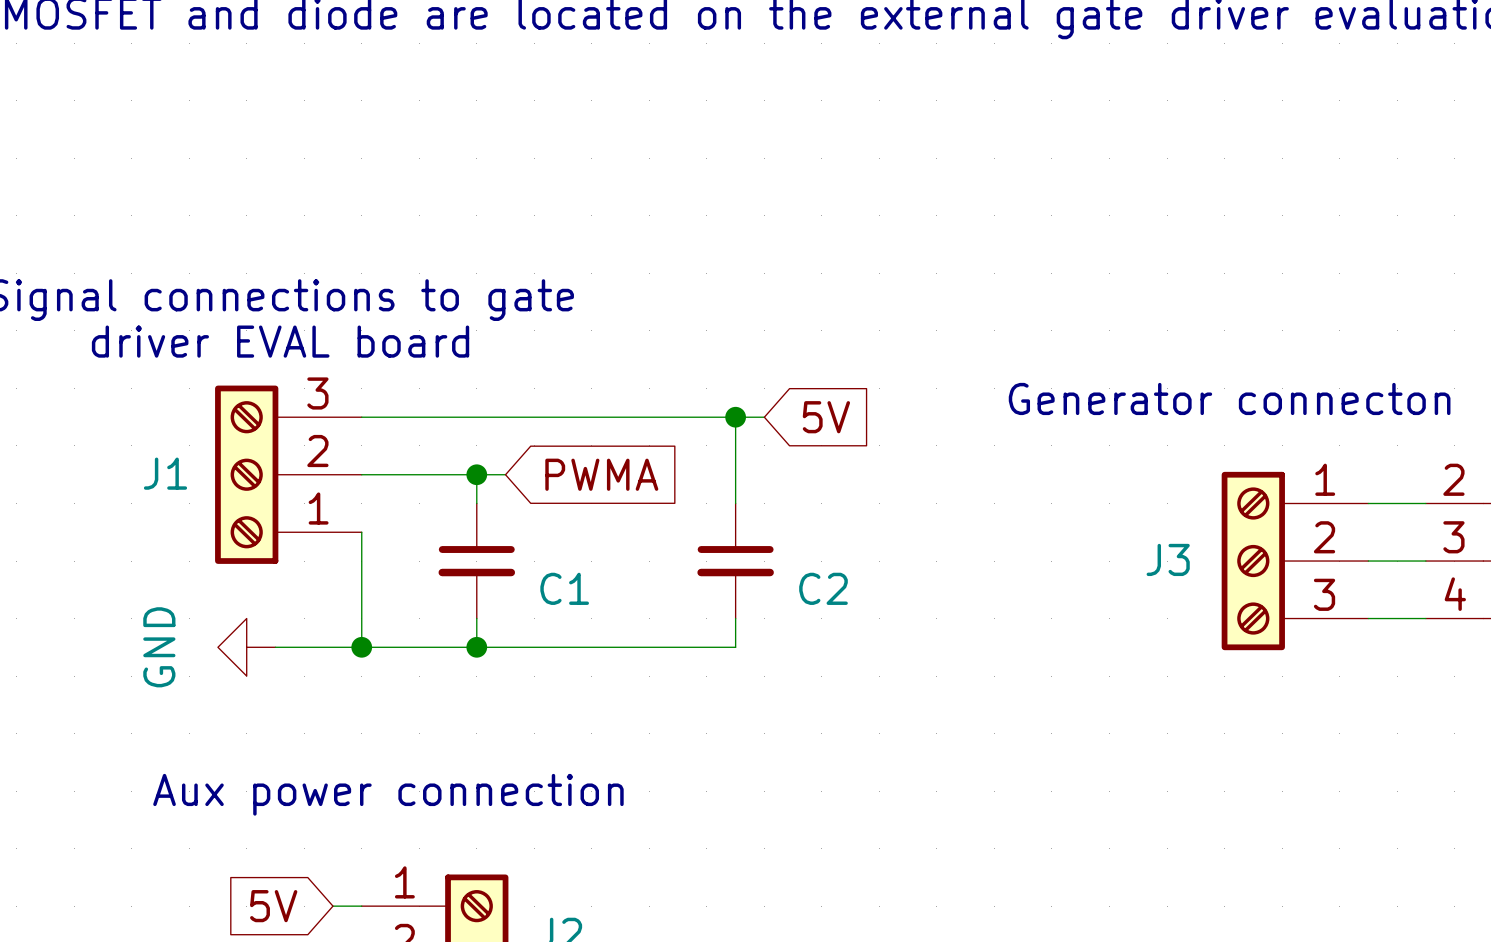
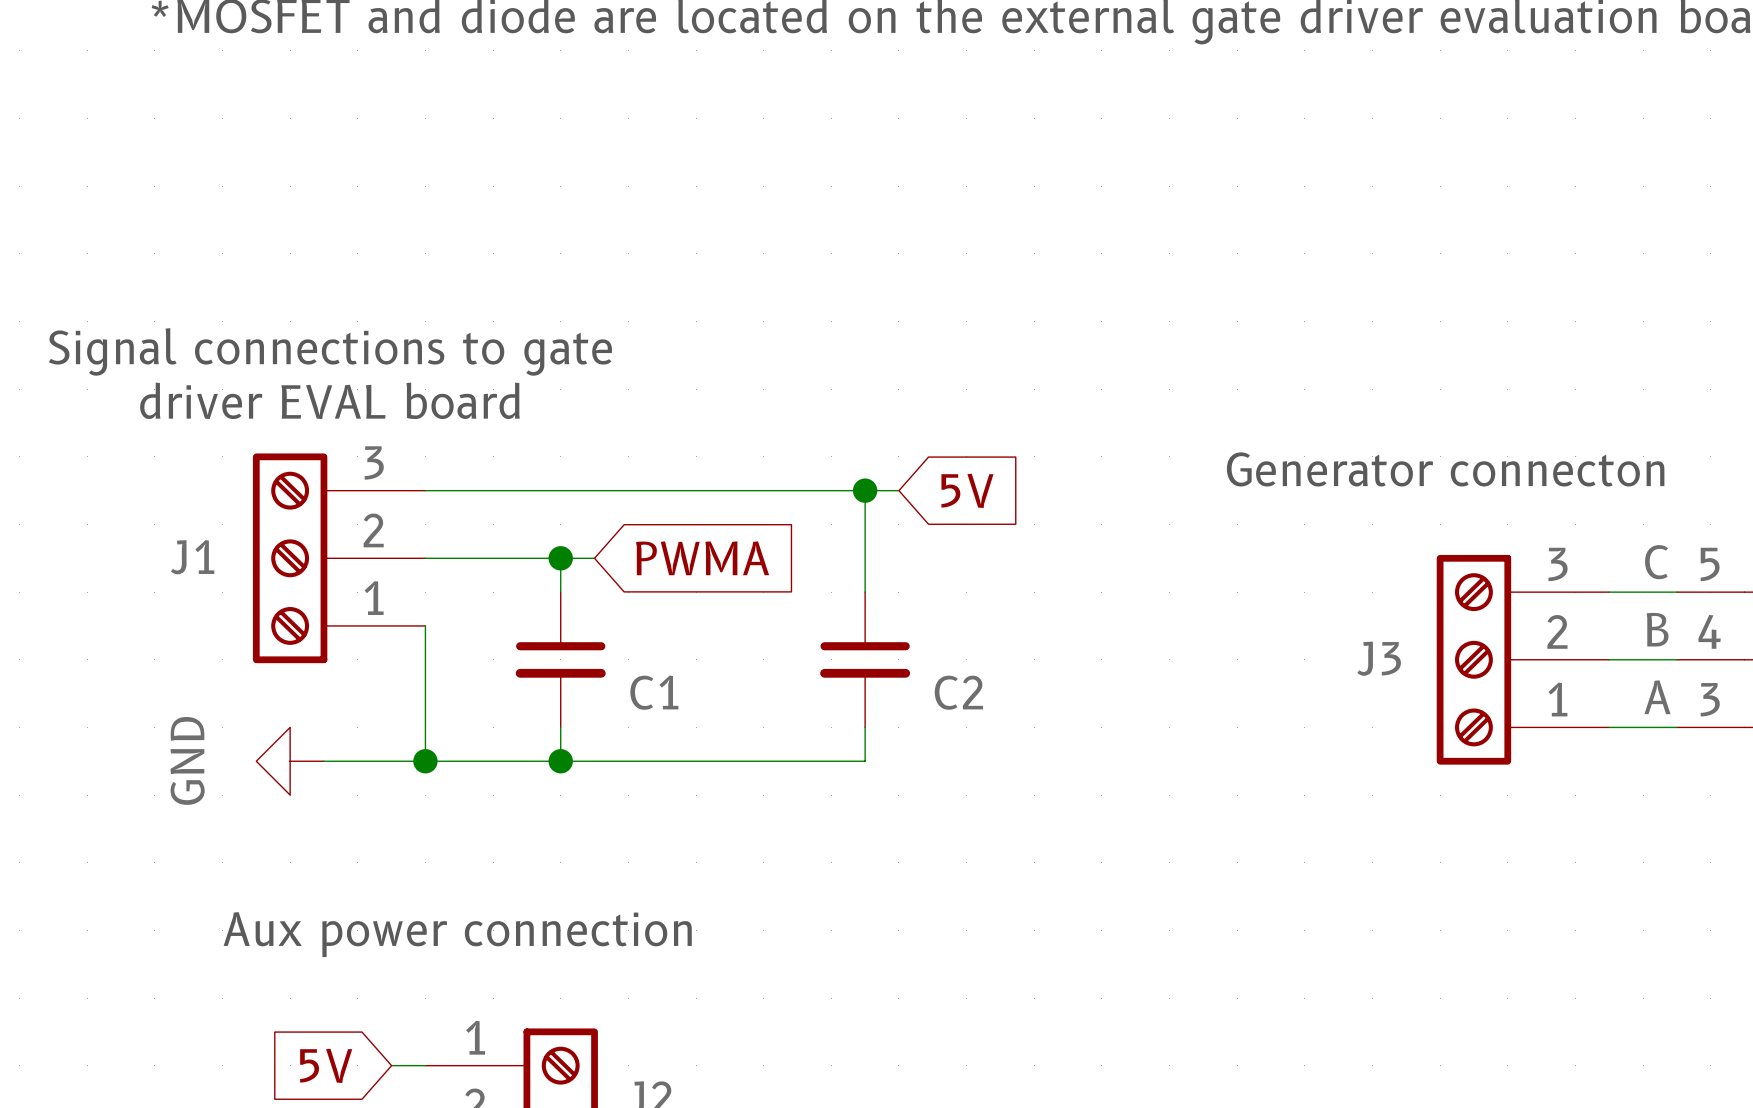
label: none -> C (1656, 562)
J3 pin number: 1 (1325, 479) -> 3 (1558, 564)
part pin number: 2 (1453, 479) -> 5 (1710, 564)
label: none -> B (1657, 629)
part pin number: 3 (1453, 537) -> 4 (1709, 631)
label: none -> A (1657, 697)
J3 pin number: 3 (1324, 594) -> 1 (1557, 699)
part pin number: 4 (1455, 594) -> 3 (1710, 699)

